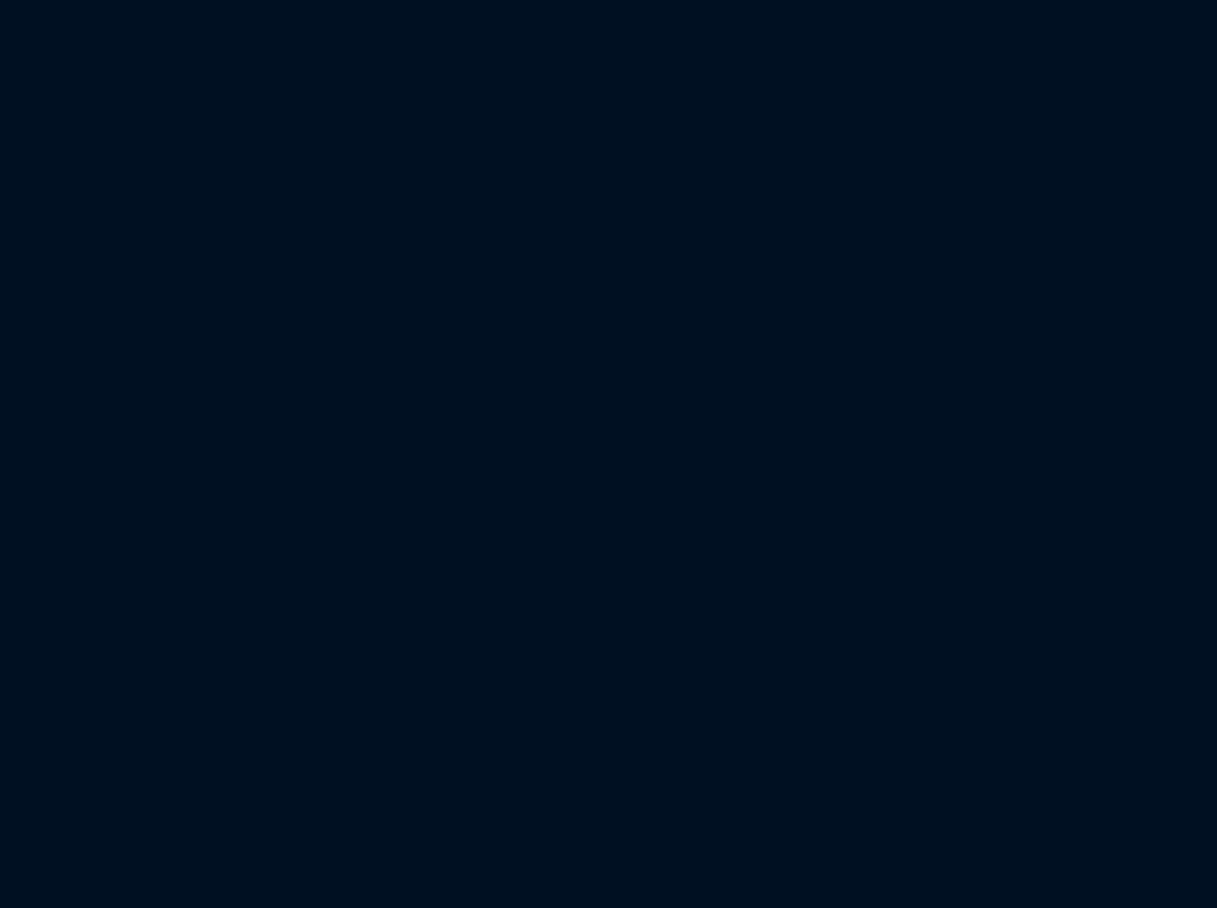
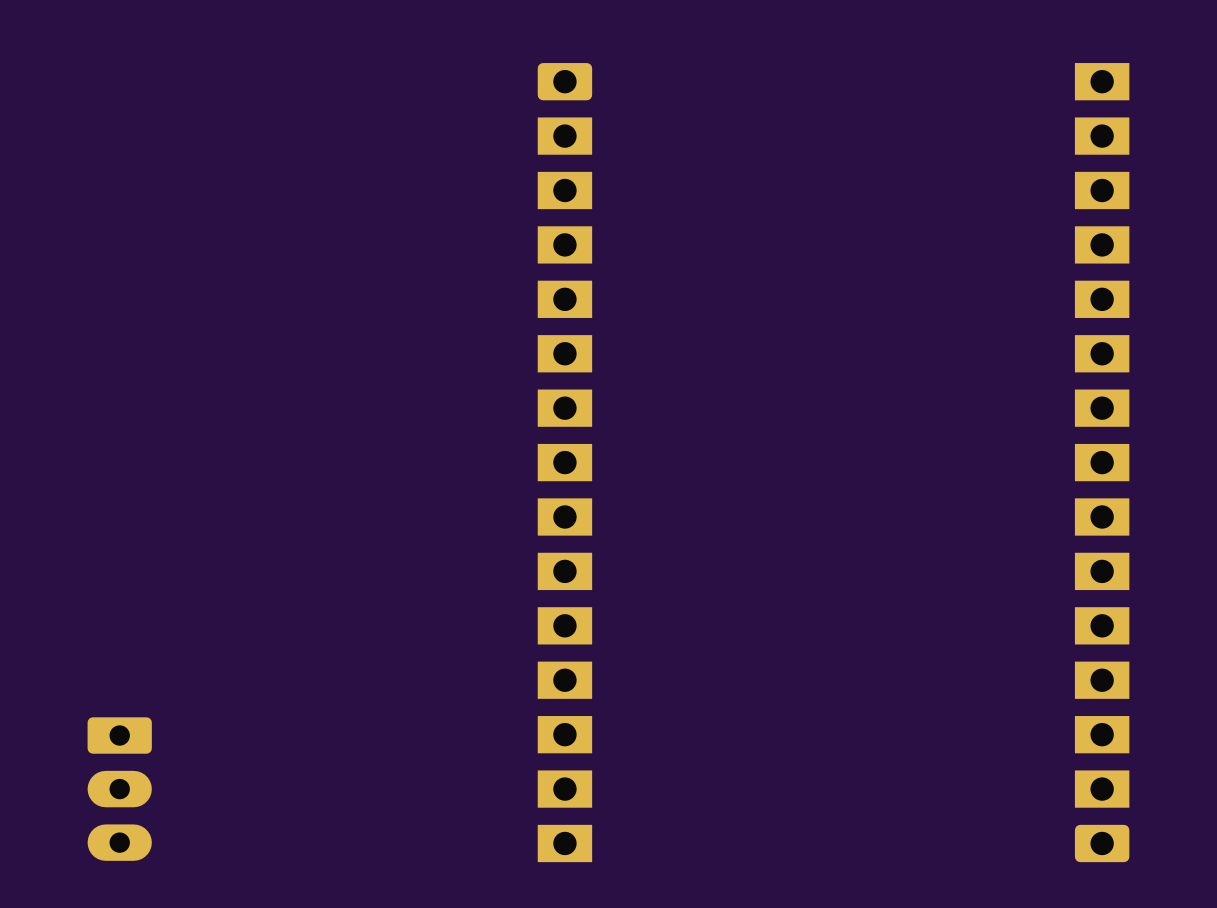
part: none -> (564, 462)
part: none -> (1102, 462)
part: none -> (119, 789)

